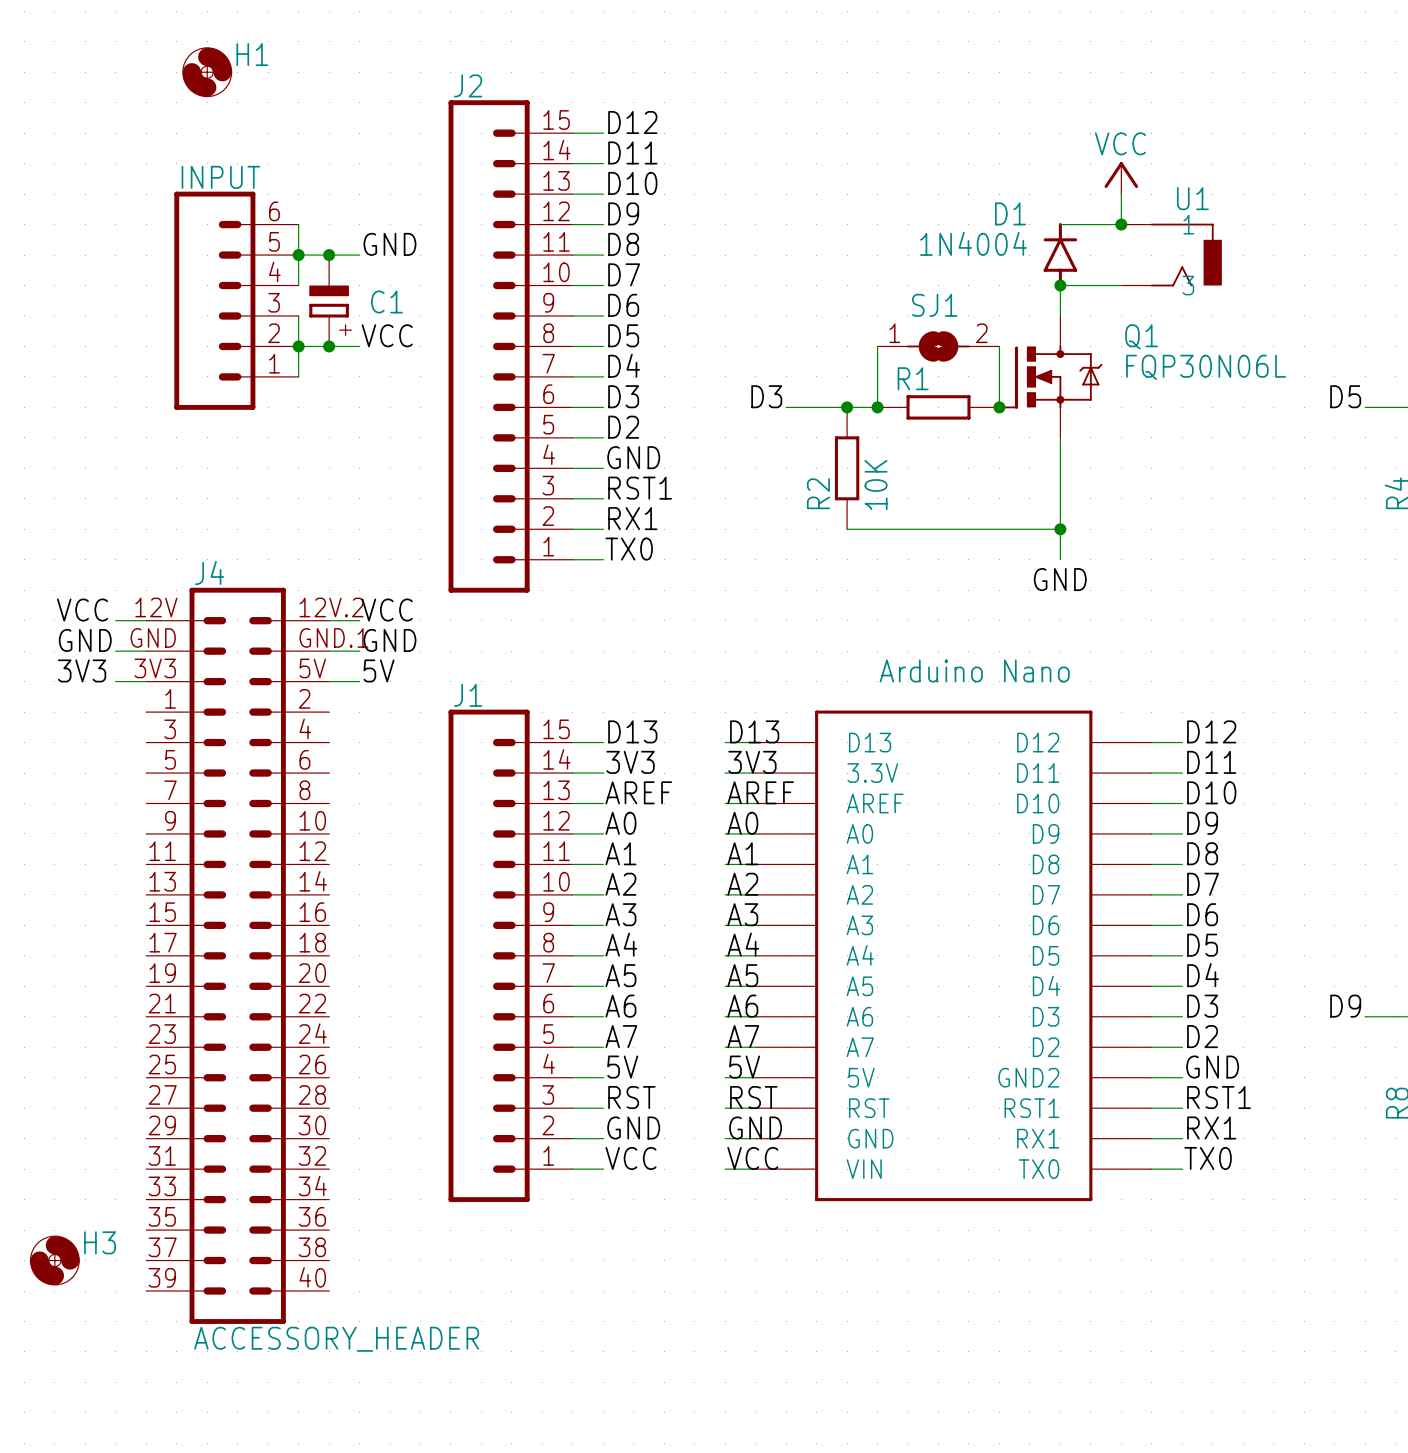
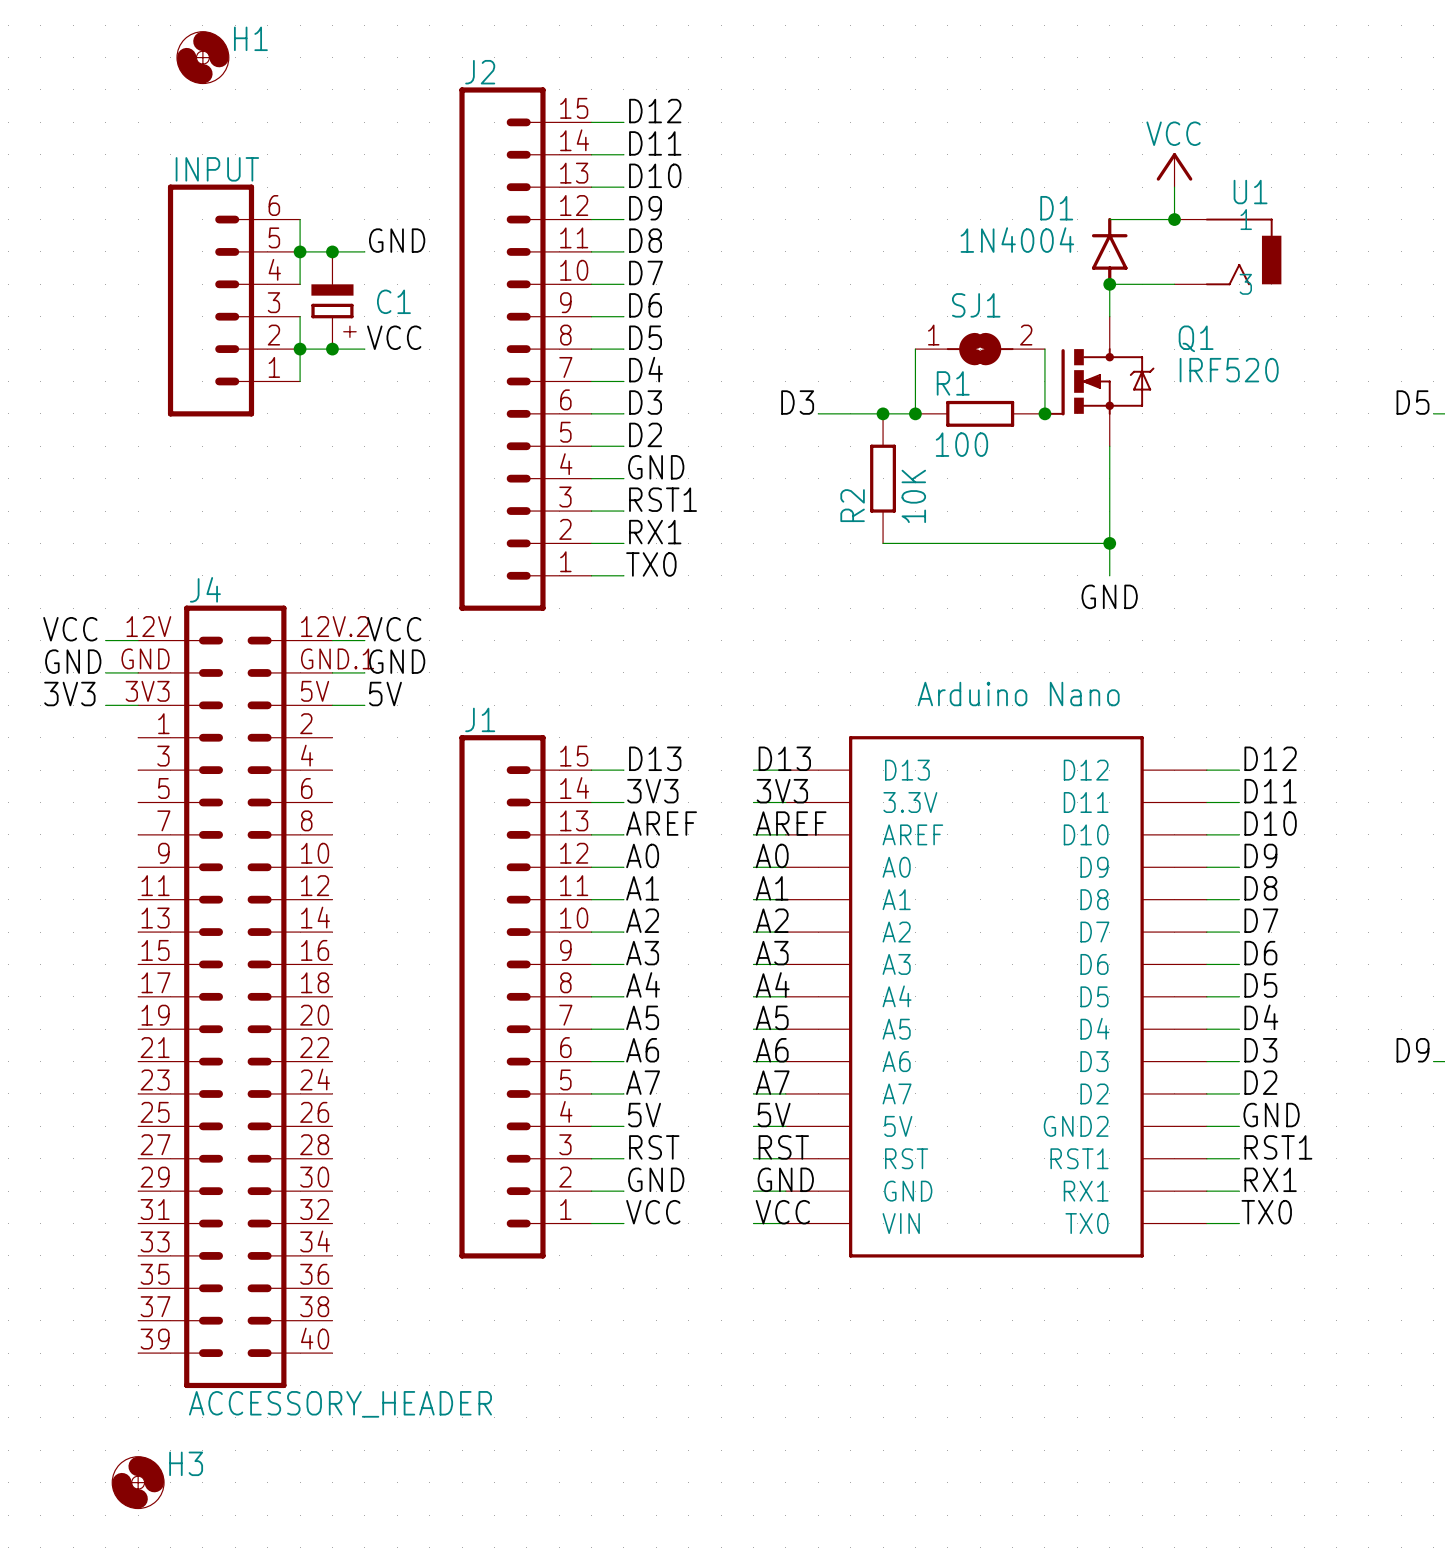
Q1 value: FQP30N06L (1206, 367) -> IRF520 (1229, 370)
R1 value: none -> 100 (961, 444)
H3 position: (54, 1260) -> (138, 1482)

